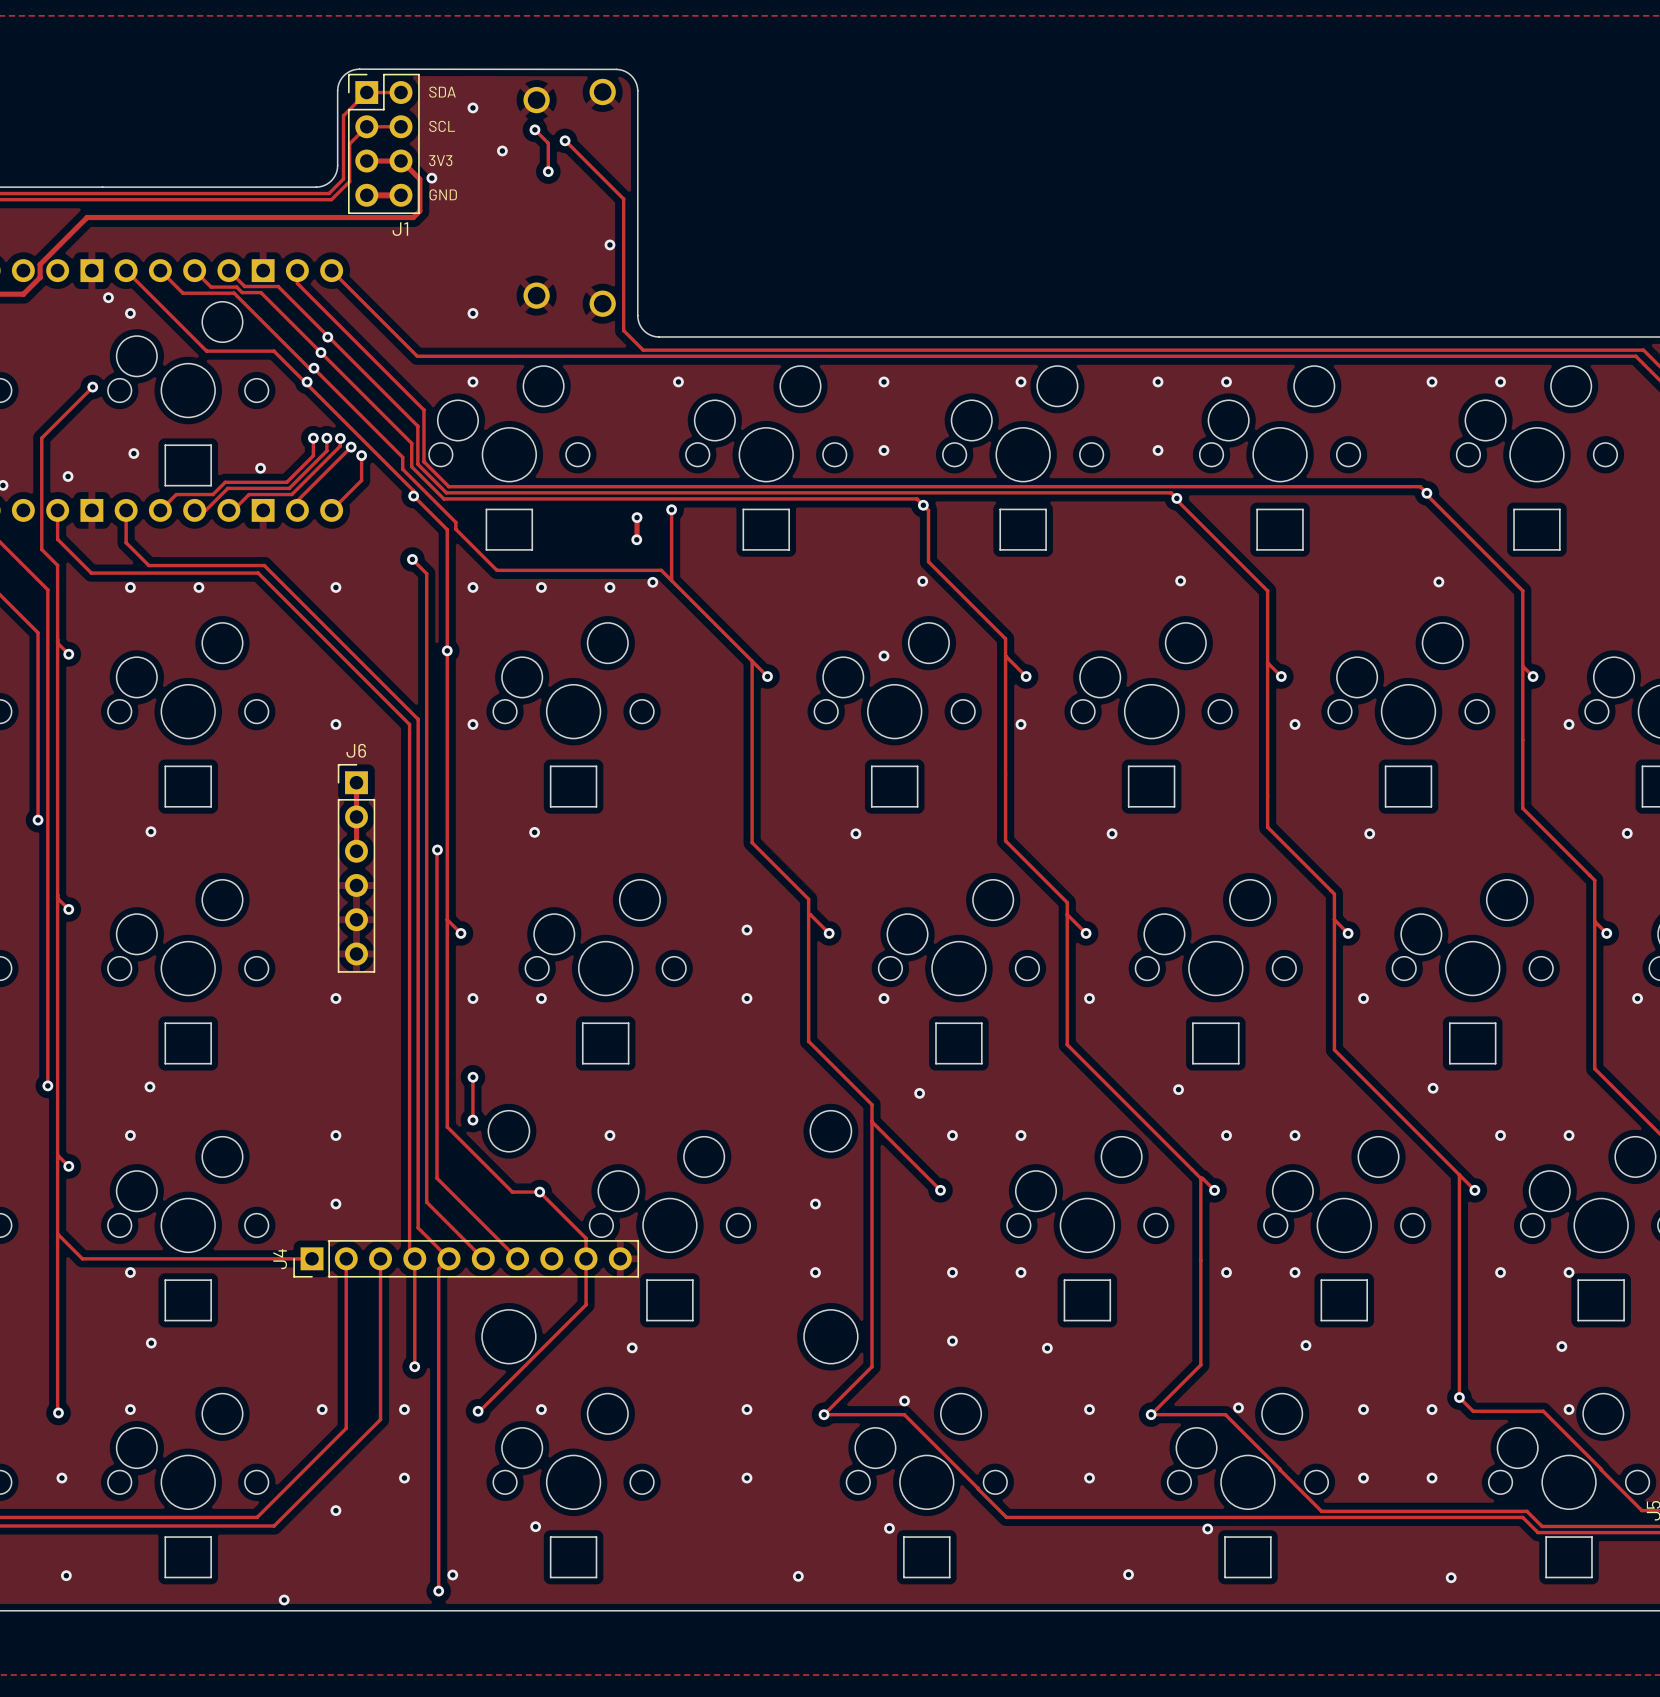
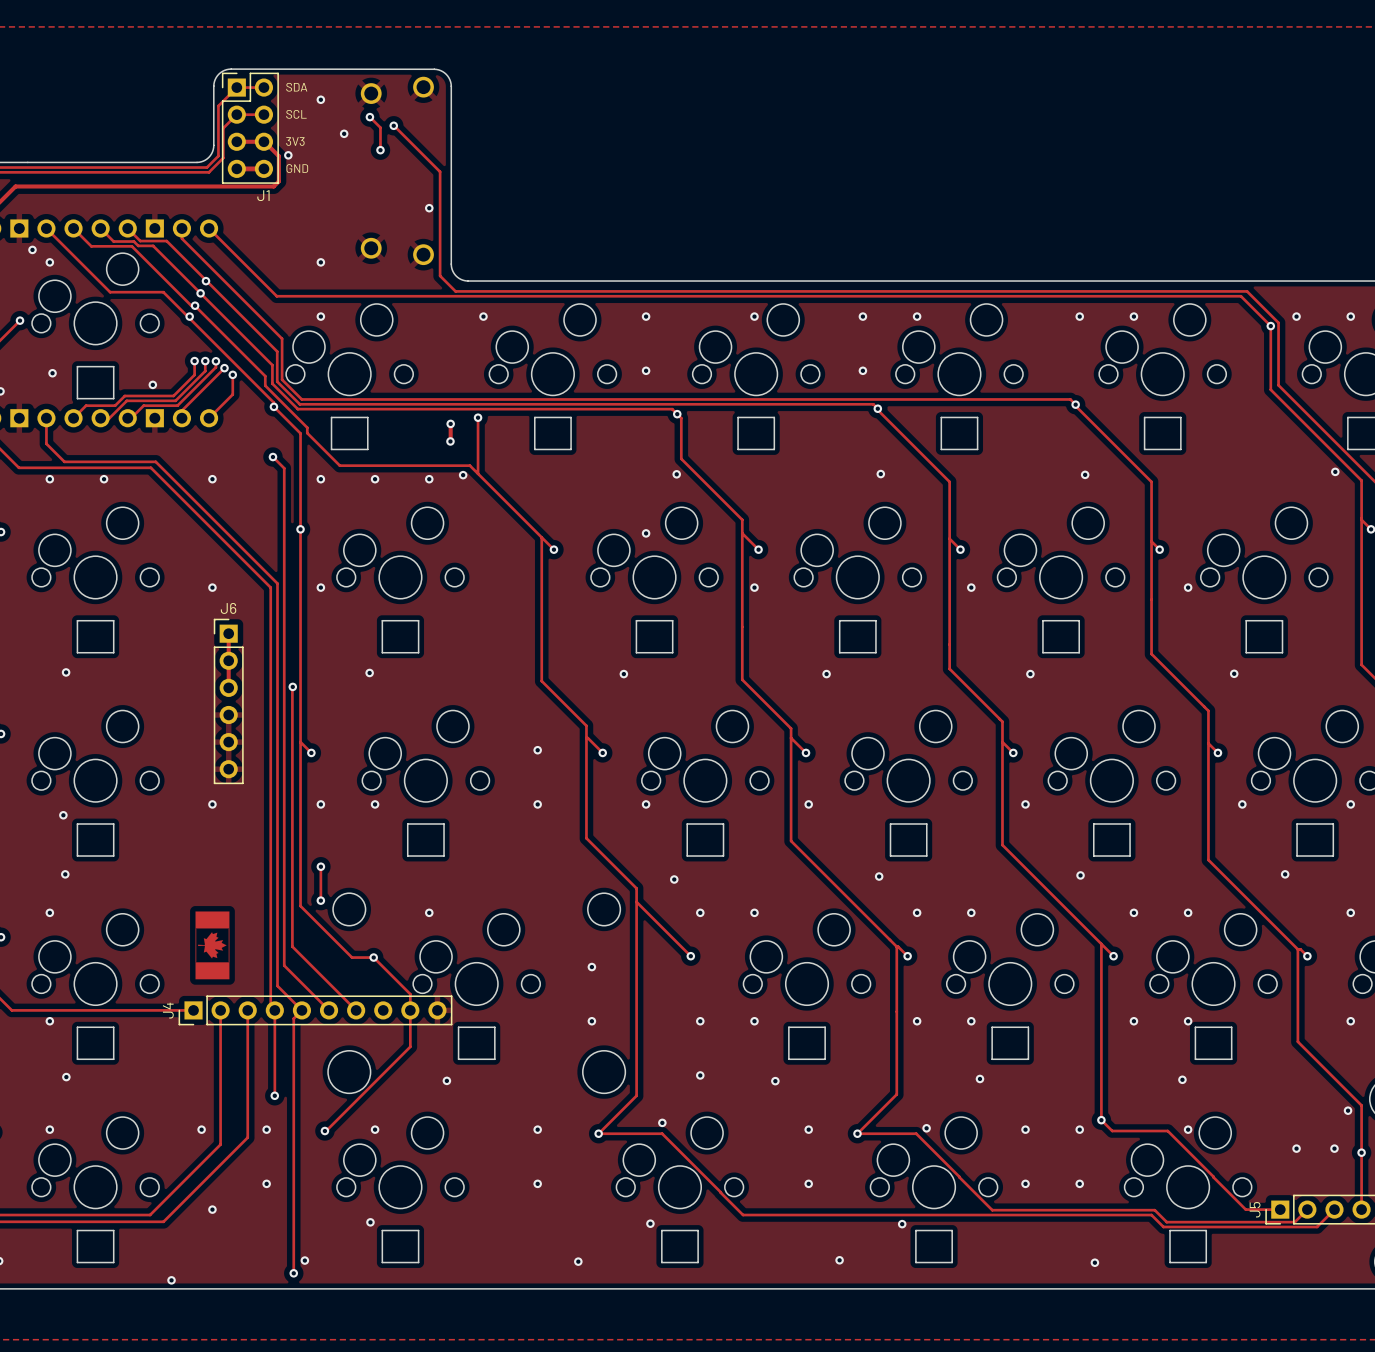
via: none -> (63, 815)
drawing: none -> [195, 911, 230, 980]
via: (335, 1135) -> none
via: (335, 1204) -> none

